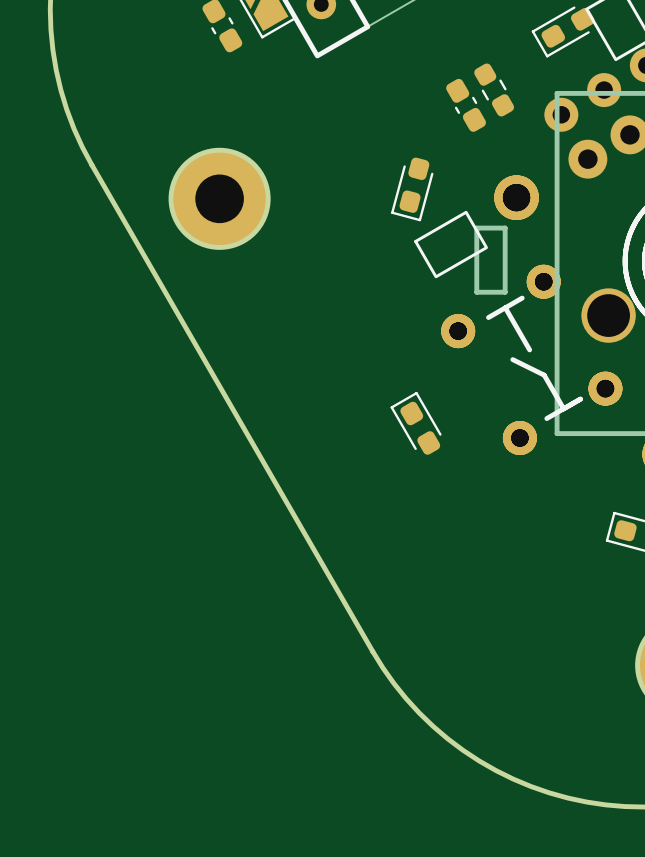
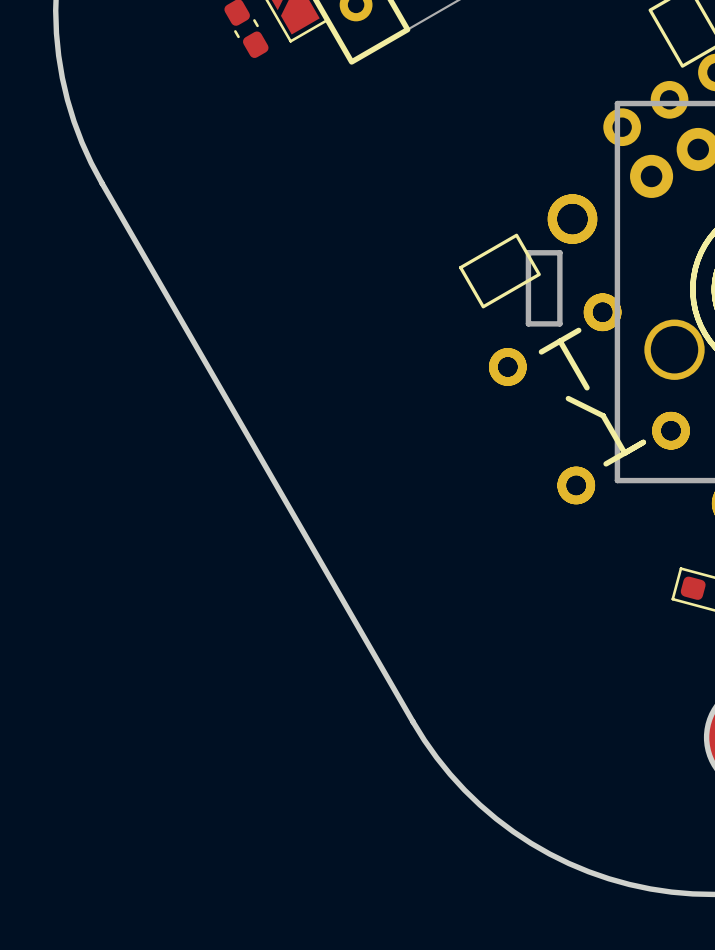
part: (563, 31) -> none
part: (494, 89) -> none
part: (466, 105) -> none
round board edge: [168, 147, 271, 250] -> none
part: (412, 189) -> none
part: (219, 198) -> none
part: (416, 423) -> none

